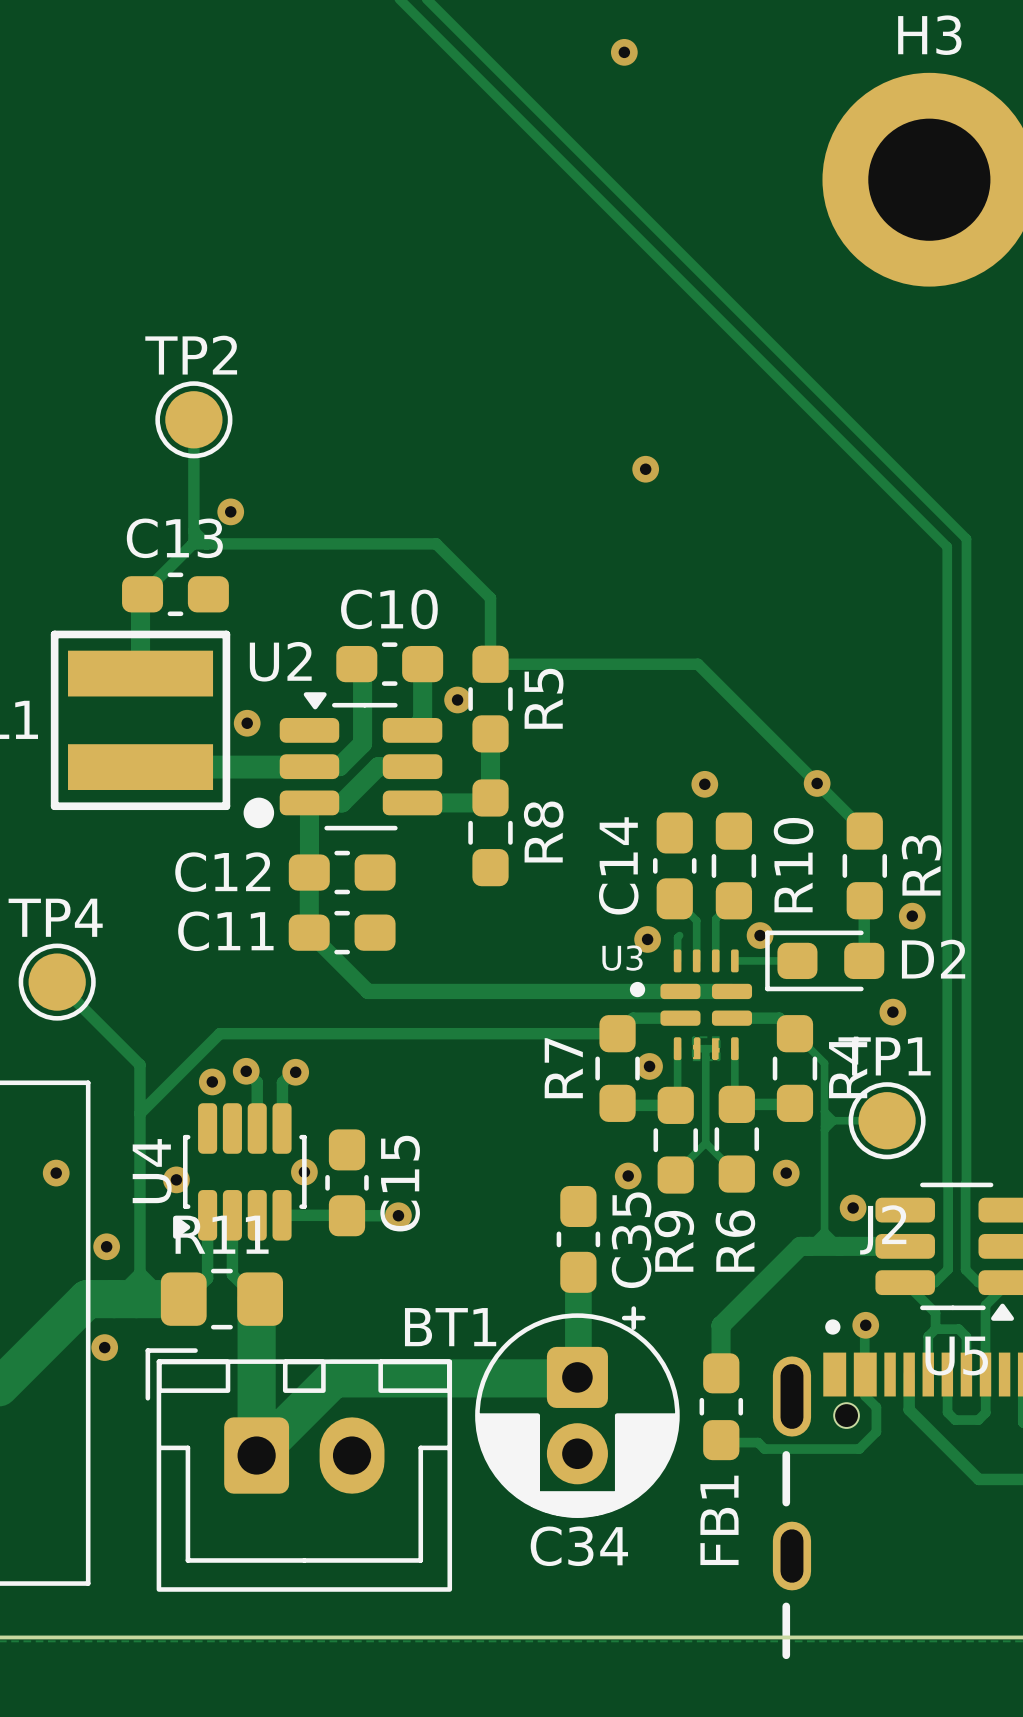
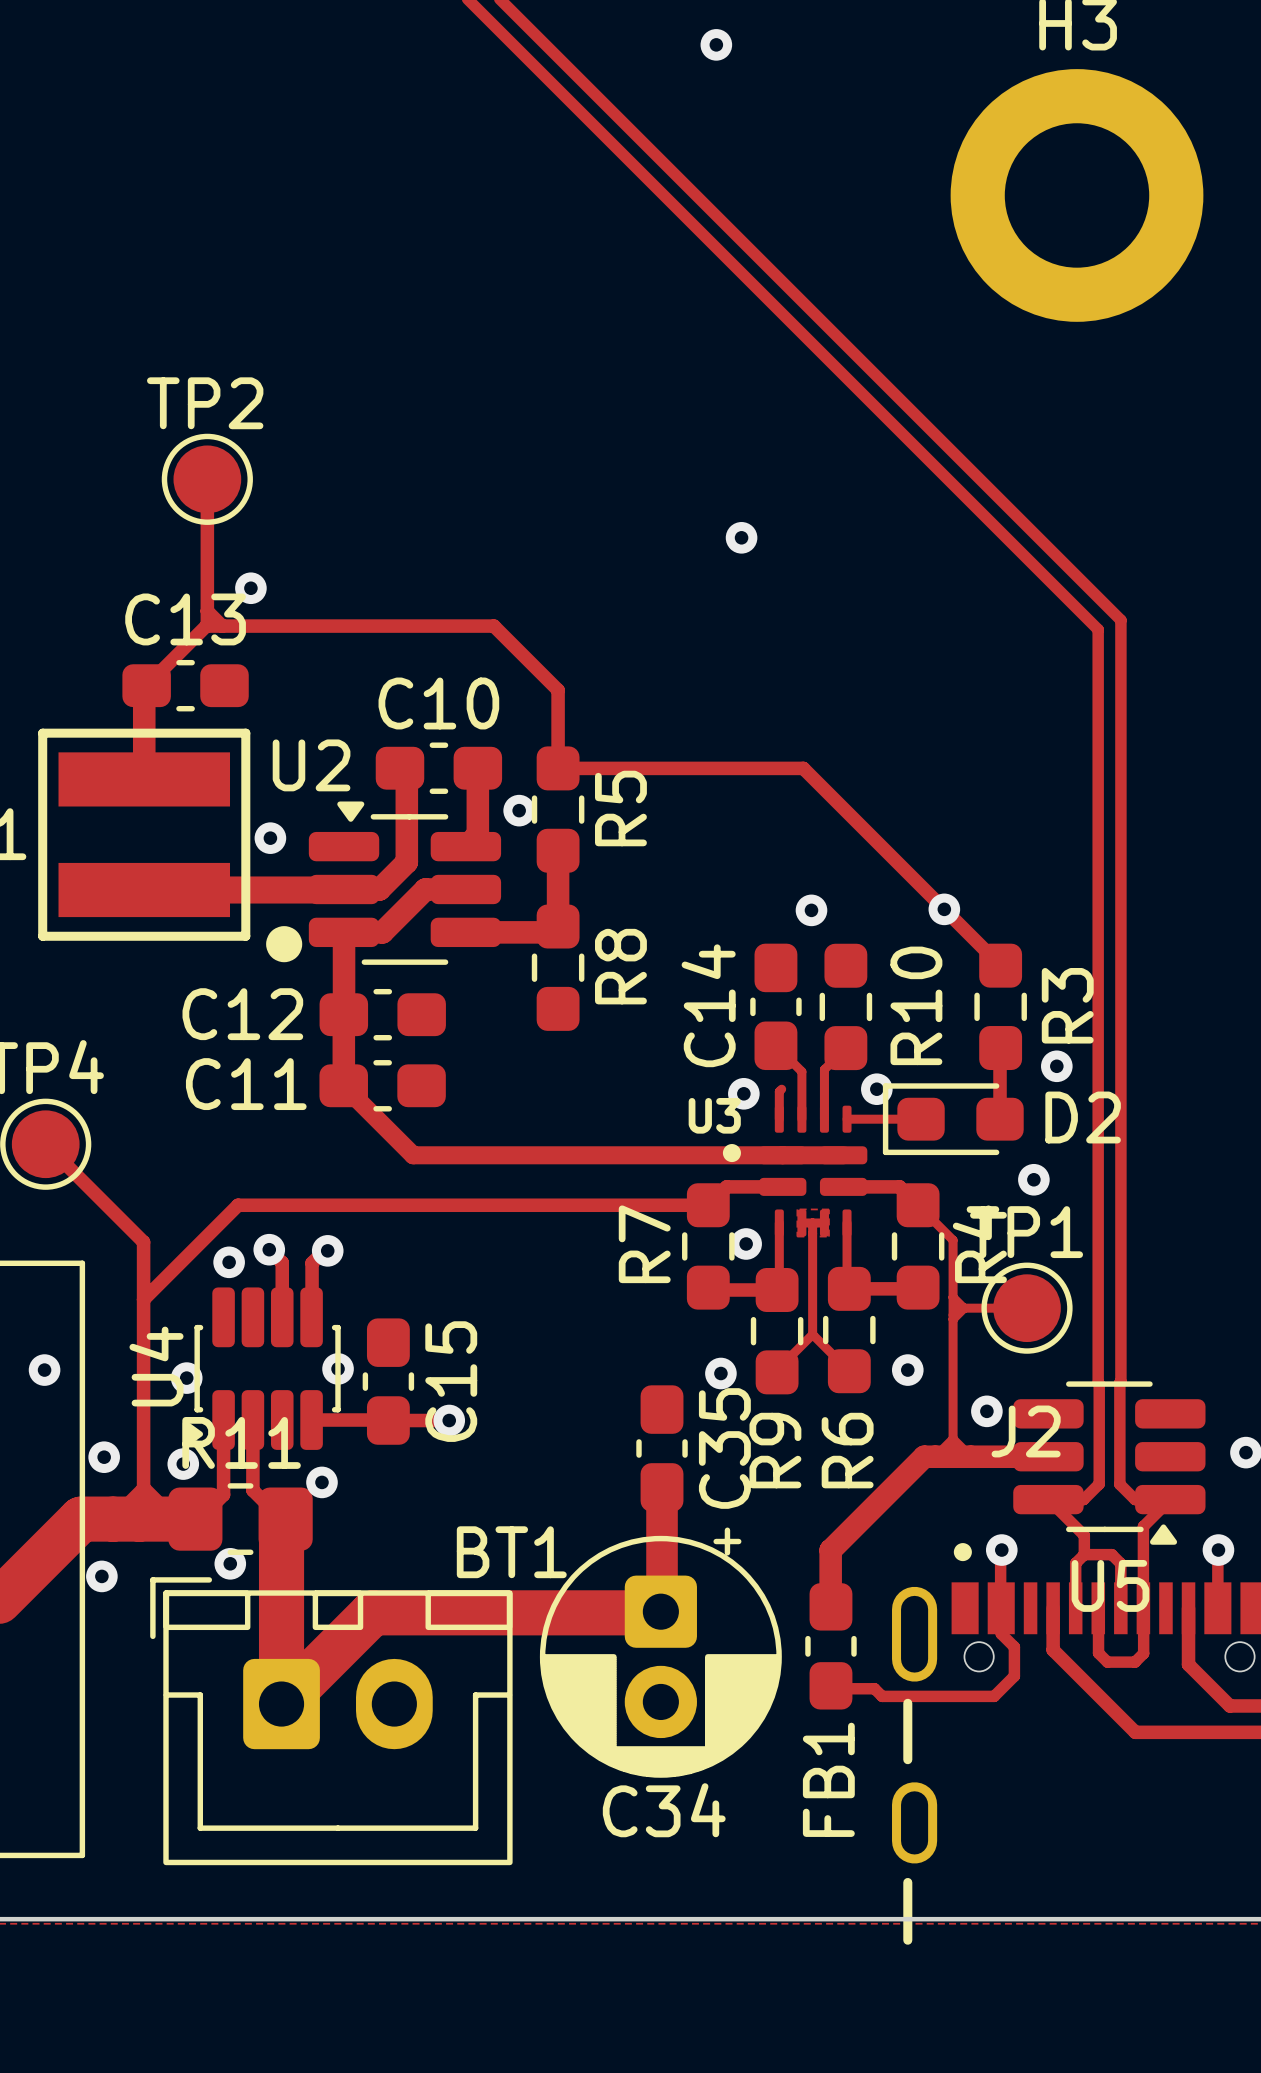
via: none -> (183, 1464)
via: none -> (321, 1482)
via: none -> (230, 1563)

